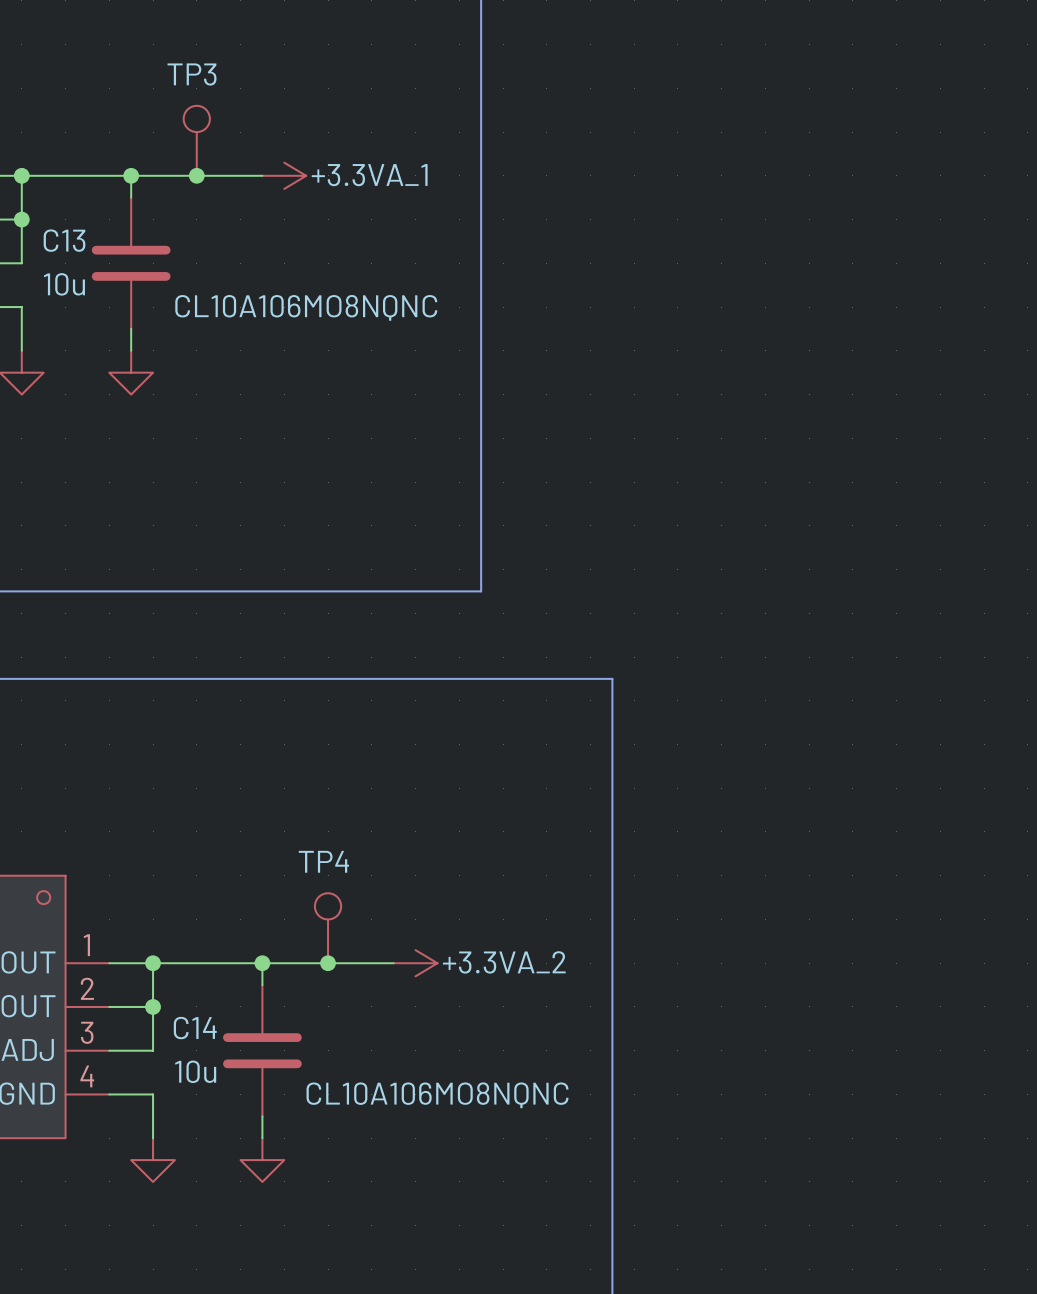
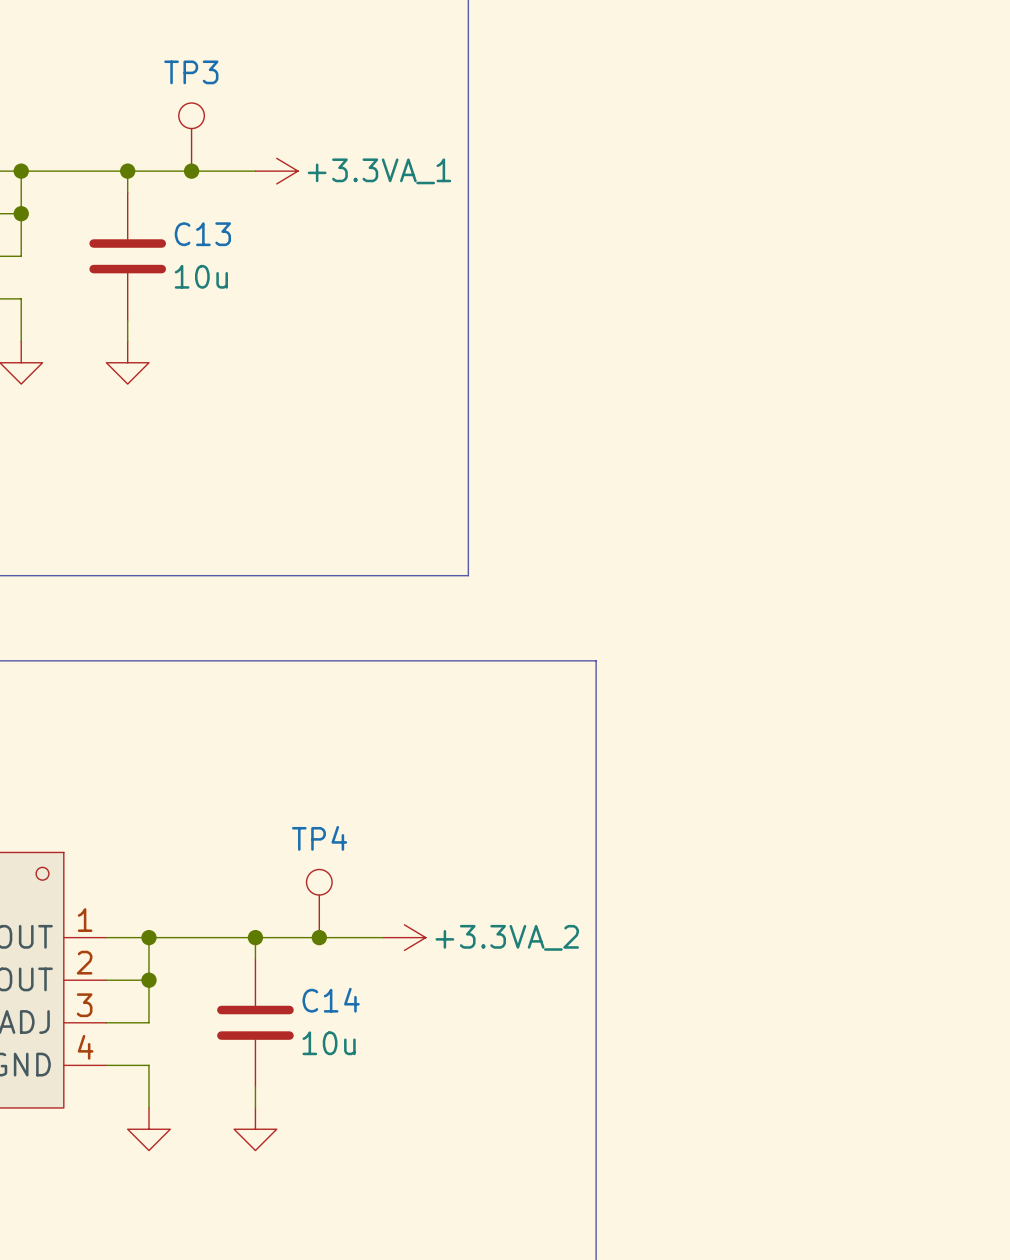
C13 name position: C13 (64, 240) -> C13 (202, 234)
C13 value position: 10u (64, 284) -> 10u (201, 276)
C13 text: CL10A106MO8NQNC (306, 307) -> none
C14 name position: C14 (195, 1028) -> C14 (331, 1000)
C14 value position: 10u (195, 1071) -> 10u (329, 1043)
C14 text: CL10A106MO8NQNC (437, 1095) -> none

